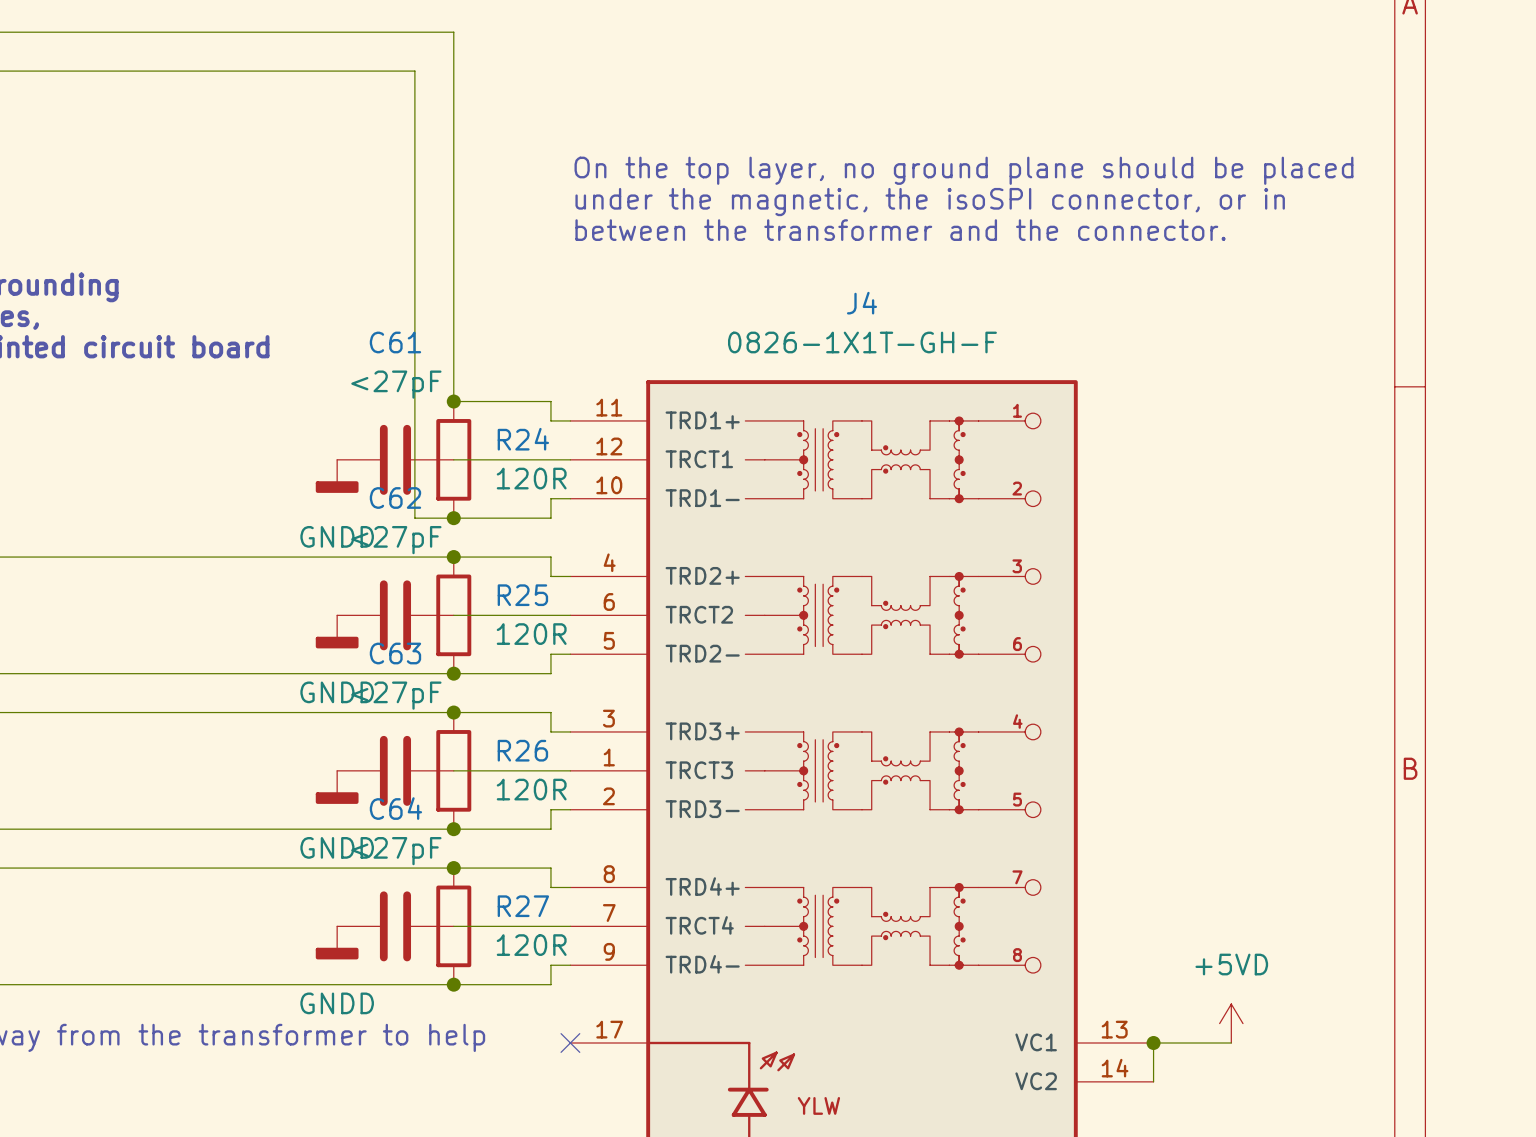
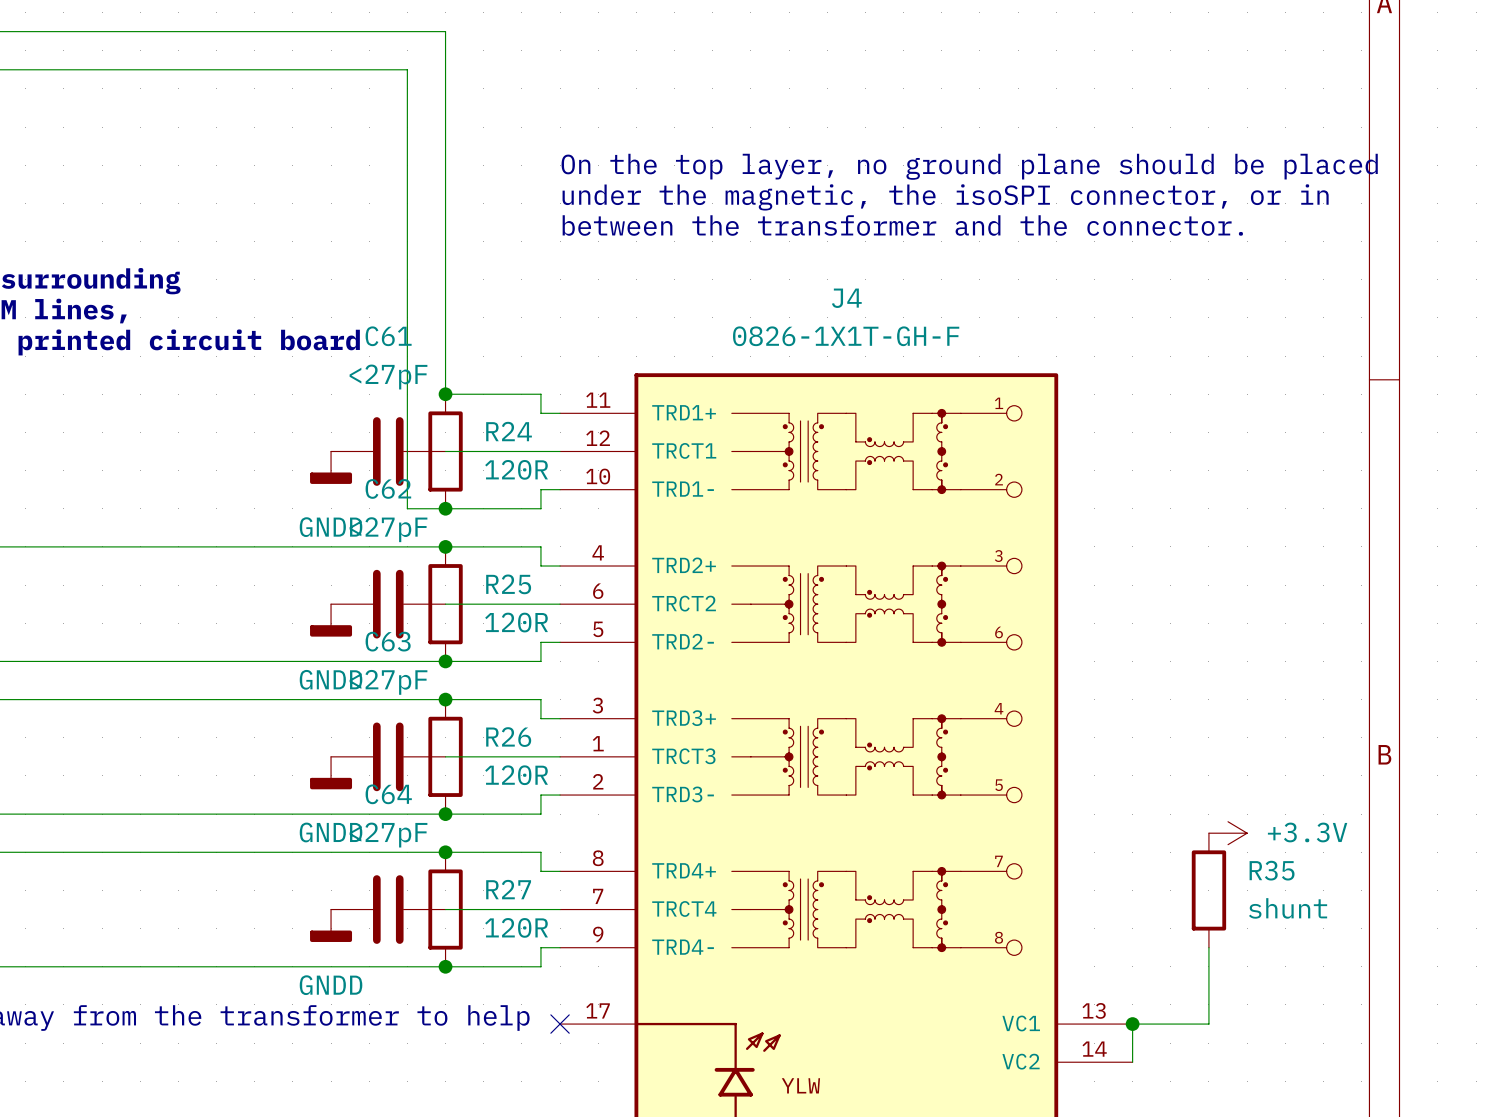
power symbol: none -> +3.3V (1228, 833)
R35: none -> shunt (1208, 890)
wire: none -> (1208, 947) (1208, 1024)
power symbol: +5VD (1231, 1023) -> none

